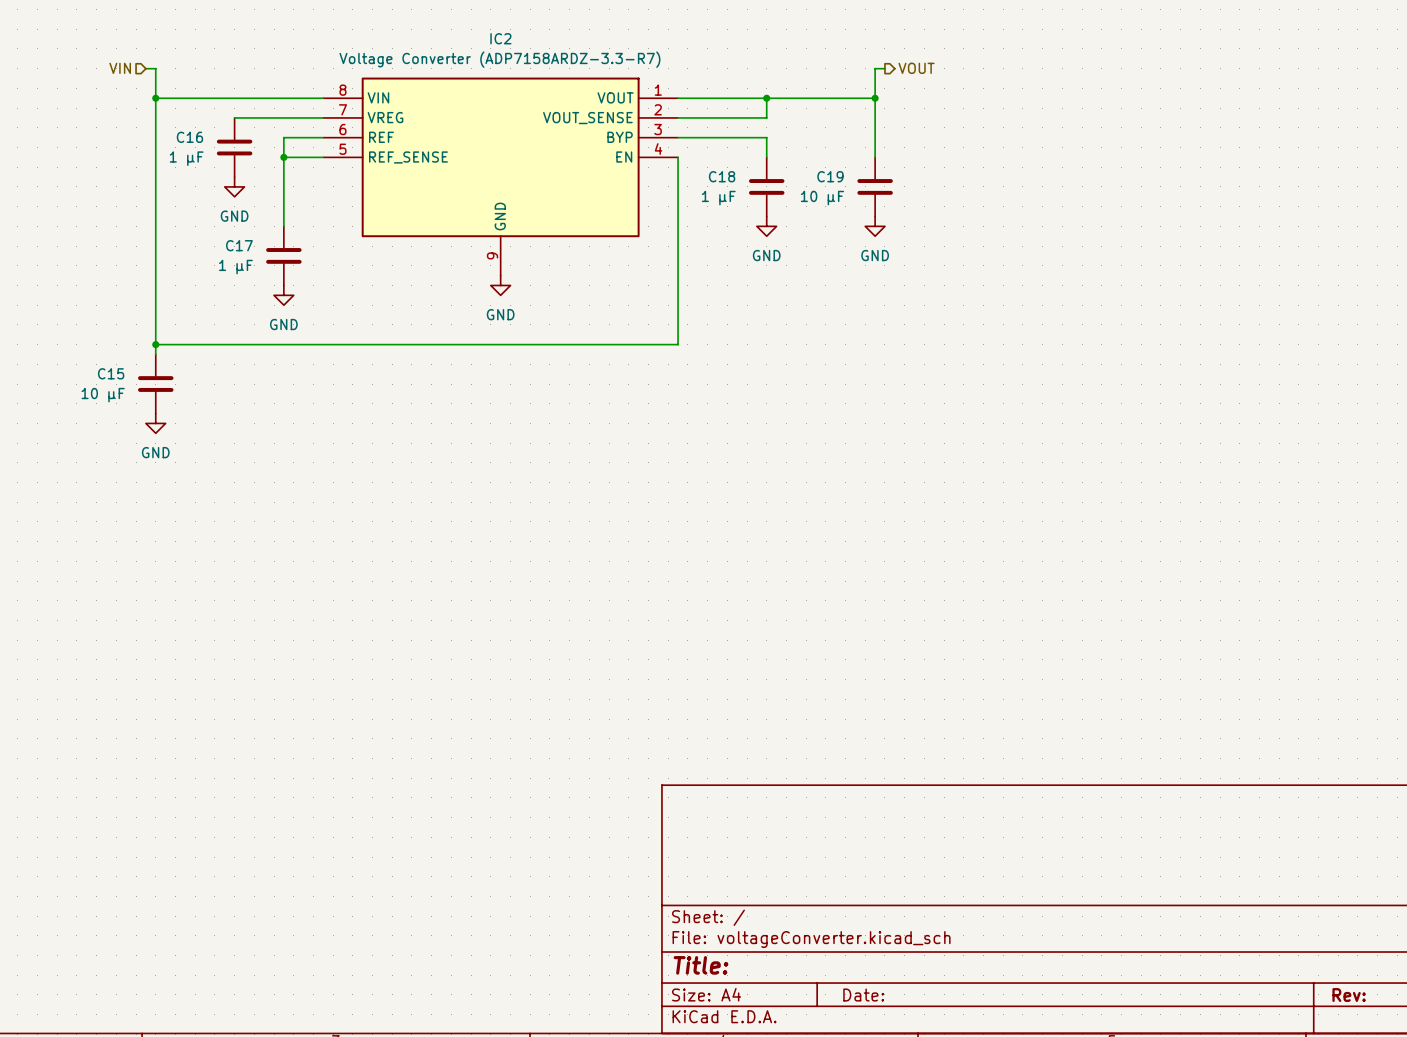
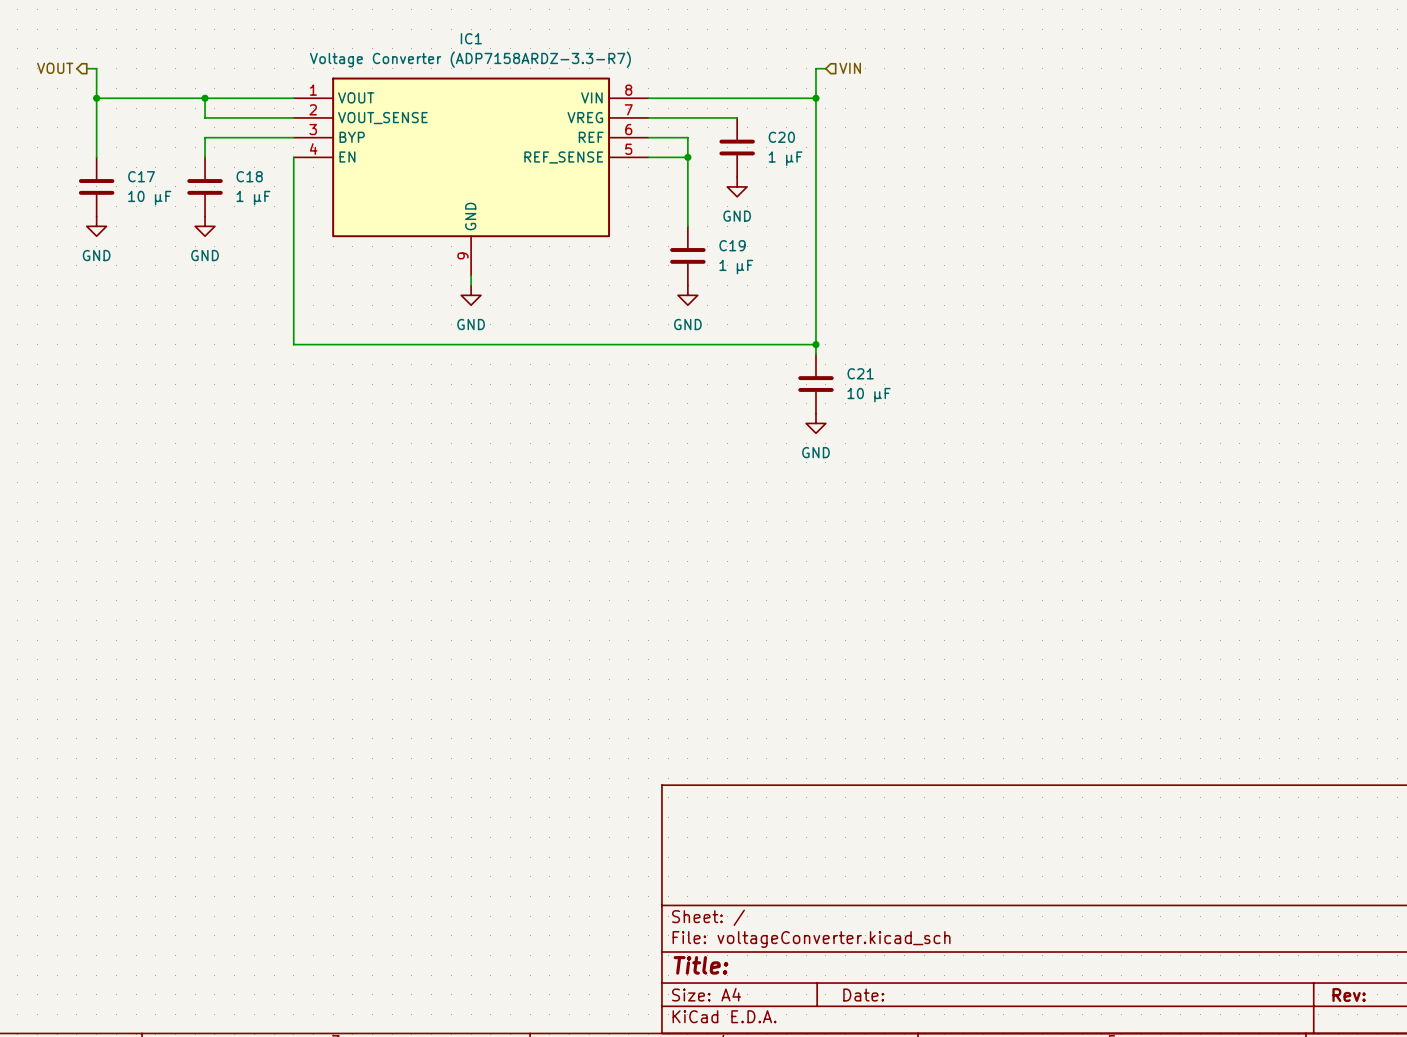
hierarchical label: none -> VOUT (55, 68)
wire: none -> (86, 68) (96, 68) (96, 157)
hierarchical label: VIN (120, 68) -> none
wire: (145, 68) (155, 68) (155, 354) -> none
wire: none -> (825, 68) (815, 68) (815, 354)
hierarchical label: none -> VIN (850, 68)
wire: (884, 68) (875, 68) (875, 157) -> none
hierarchical label: VOUT (916, 68) -> none
wire: none -> (96, 98) (155, 98)
junction: none -> (96, 98)
junction: (155, 98) -> none
wire: none -> (205, 98) (205, 117) (234, 117)
junction: none -> (205, 98)
wire: (766, 98) (766, 117) (737, 117) -> none
junction: (766, 98) -> none
wire: (815, 98) (875, 98) -> none
junction: none -> (815, 98)
junction: (875, 98) -> none
wire: (283, 137) (283, 226) -> (283, 137) (205, 137) (205, 157)
wire: (687, 137) (766, 137) (766, 157) -> (687, 137) (687, 226)
C16: 1 μF (234, 147) -> none
C20: none -> 1 μF (737, 147)
junction: (283, 157) -> none
wire: (678, 157) (678, 344) -> (815, 344) (678, 344)
junction: none -> (687, 157)
IC1: none -> Voltage Converter (ADP7158ARDZ-3.3-R7) (471, 176)
IC2: Voltage Converter (ADP7158ARDZ-3.3-R7) (500, 176) -> none
C18 name position: C18 (722, 176) -> C18 (249, 176)
C19 name position: C19 (830, 176) -> C19 (732, 245)
power symbol position: GND (234, 186) -> GND (205, 226)
C18 position: (766, 186) -> (205, 186)
C19 position: (875, 186) -> (687, 255)
C18 value position: 1 μF (718, 198) -> 1 μF (253, 198)
C19 value: 10 μF (822, 198) -> 1 μF (736, 267)
power symbol: none -> GND (96, 226)
power symbol position: GND (766, 226) -> GND (737, 186)
power symbol: GND (875, 226) -> none
C17 name position: C17 (239, 245) -> C17 (141, 176)
C17 position: (283, 255) -> (96, 186)
C17 value: 1 μF (235, 267) -> 10 μF (149, 198)
wire: none -> (471, 275) (471, 285)
power symbol position: GND (500, 285) -> GND (471, 295)
power symbol: GND (283, 295) -> none
power symbol: none -> GND (687, 295)
wire: (155, 344) (293, 344) -> (293, 157) (293, 344)
junction: (155, 344) -> none
junction: none -> (815, 344)
C15: 10 μF (155, 384) -> none
C21: none -> 10 μF (815, 384)
power symbol: GND (155, 423) -> none
power symbol: none -> GND (815, 423)

